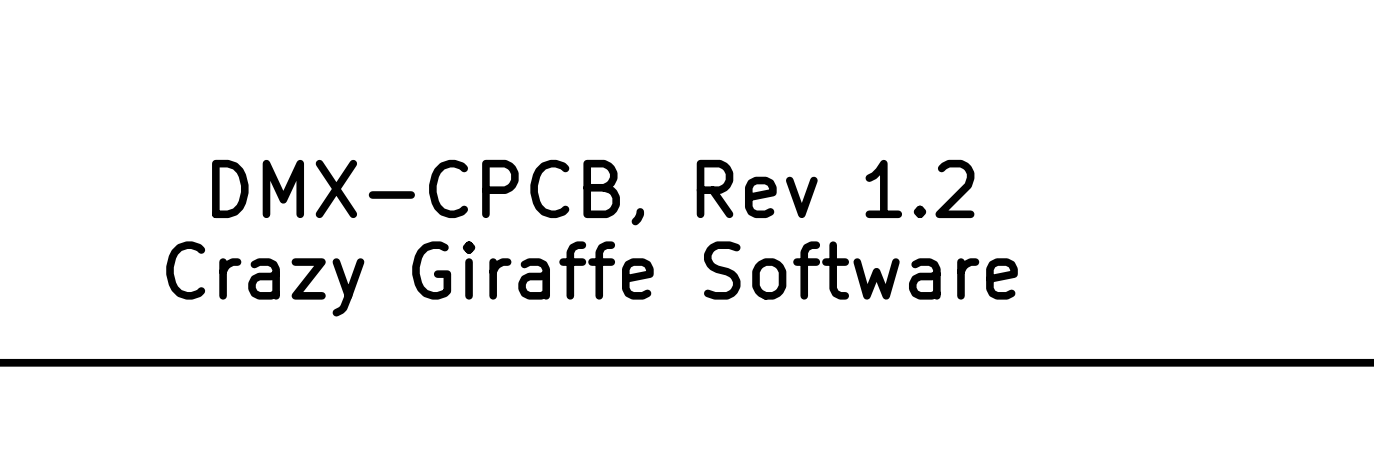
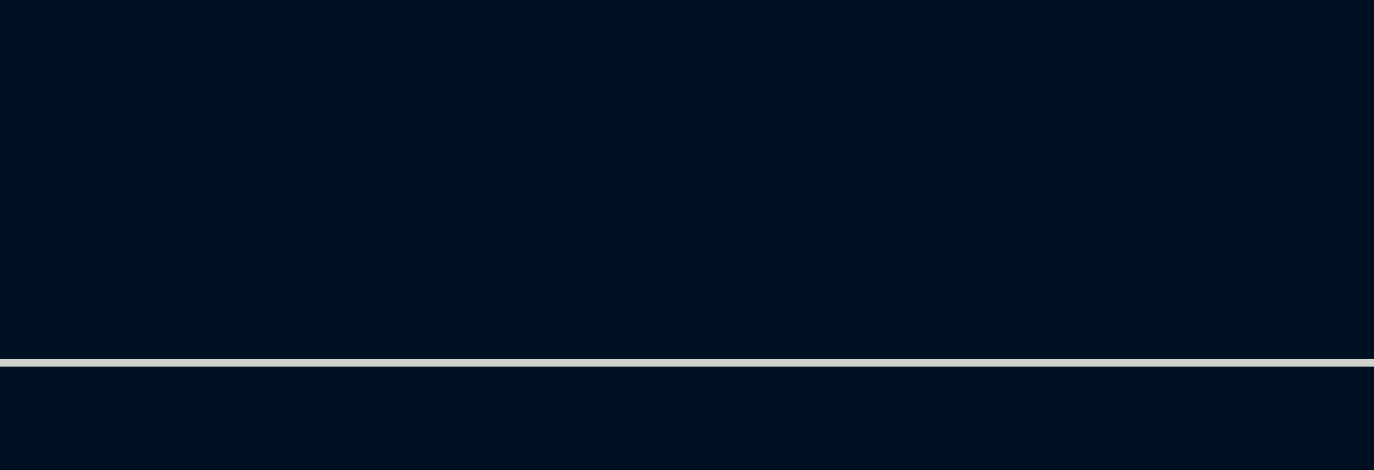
text: DMX-CPCB, Rev 1.2 (593, 192) -> none
text: Crazy Giraffe Software (592, 278) -> none

